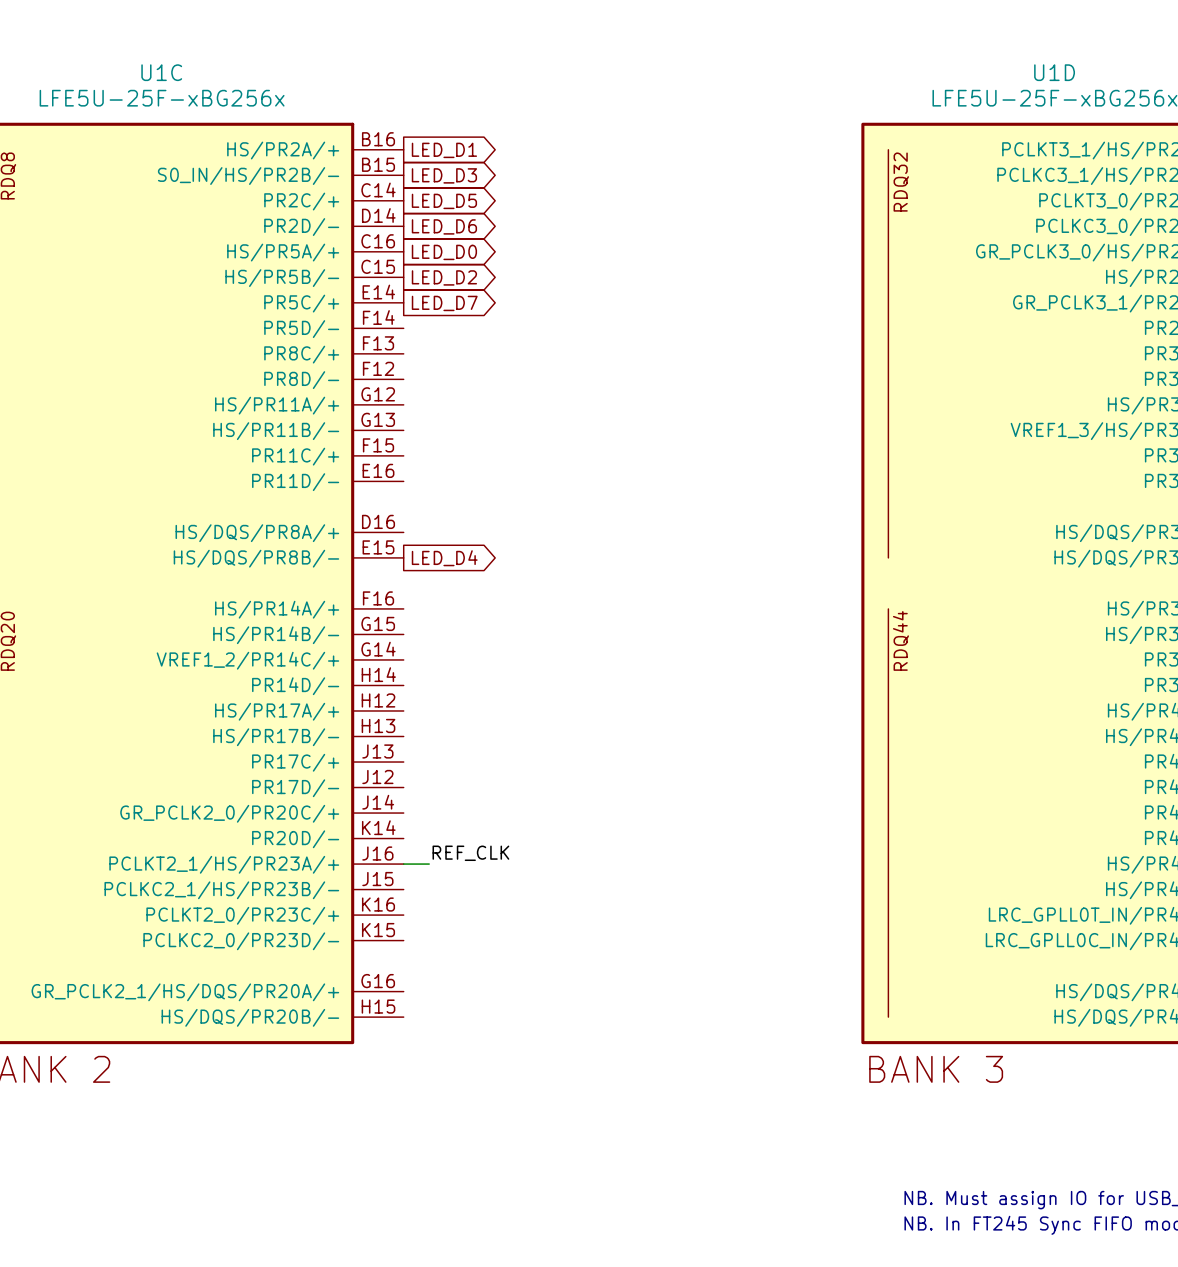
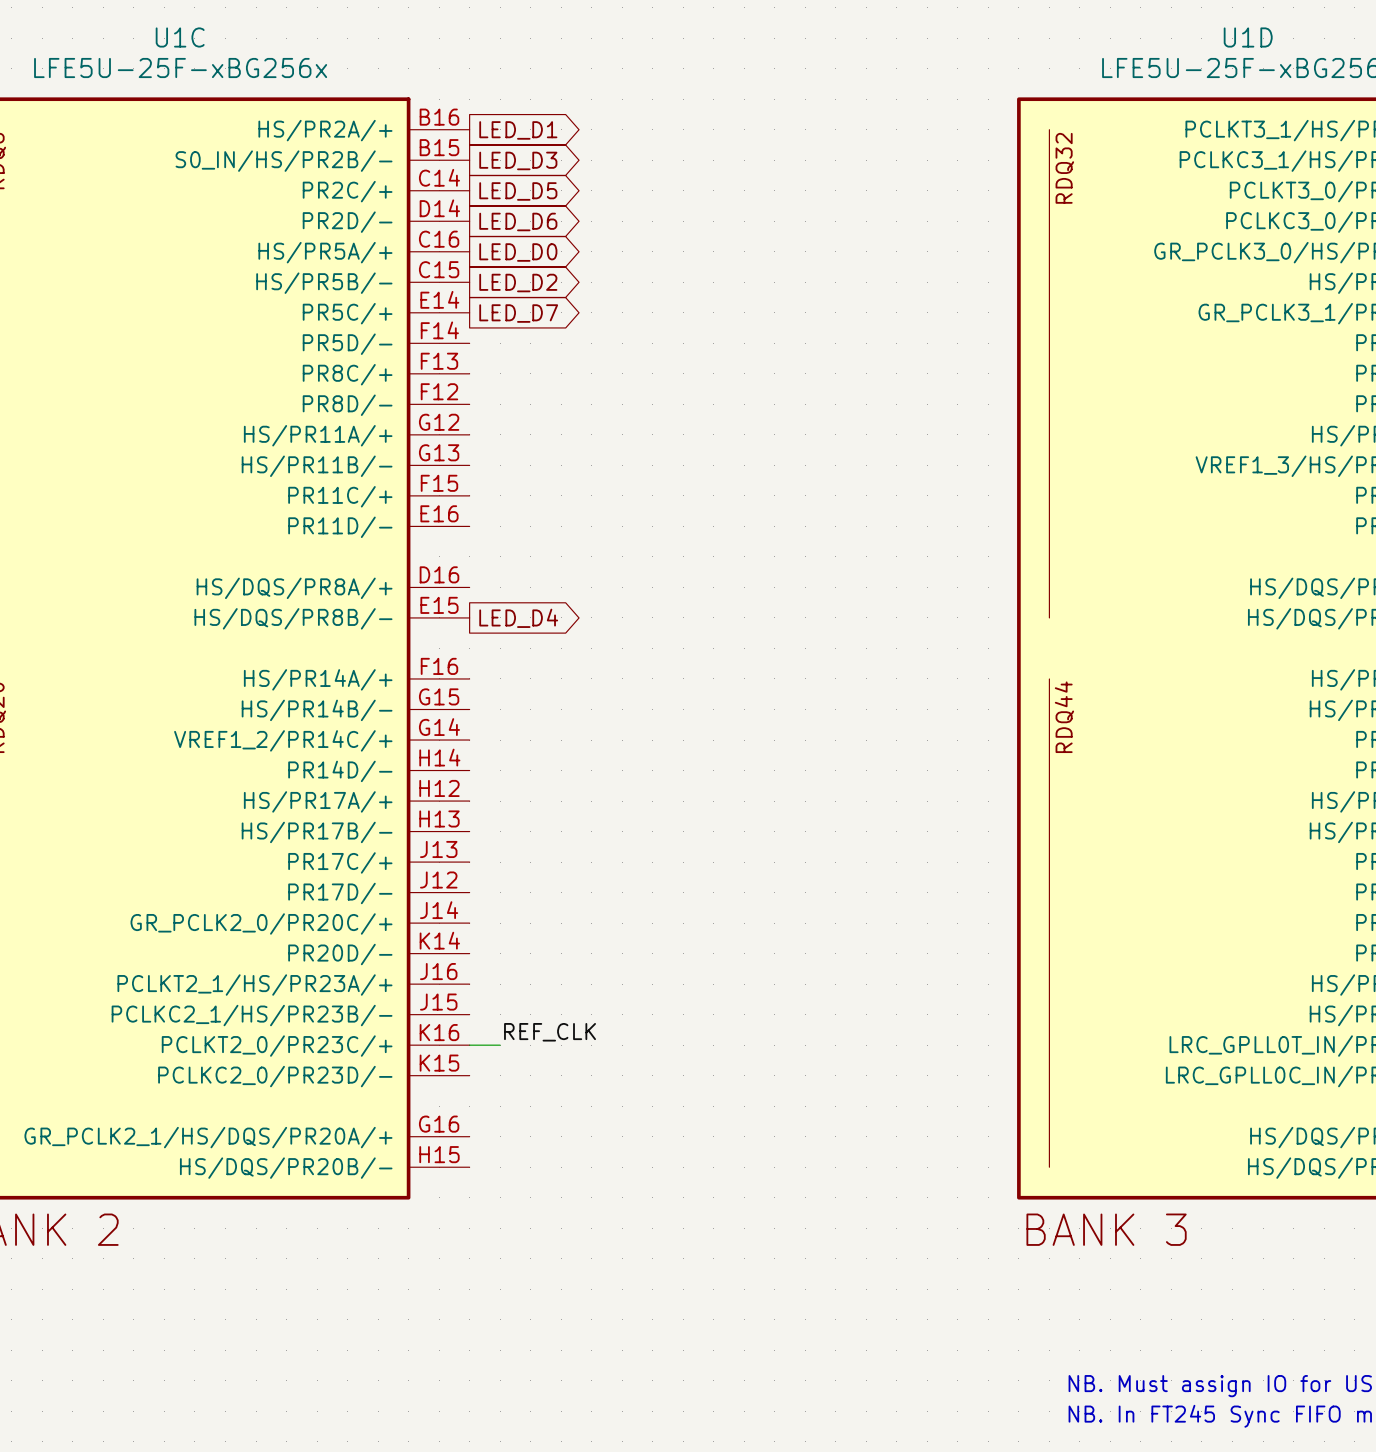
label position: REF_CLK (470, 853) -> REF_CLK (550, 1032)
wire: (403, 864) (429, 864) -> (469, 1045) (500, 1045)

